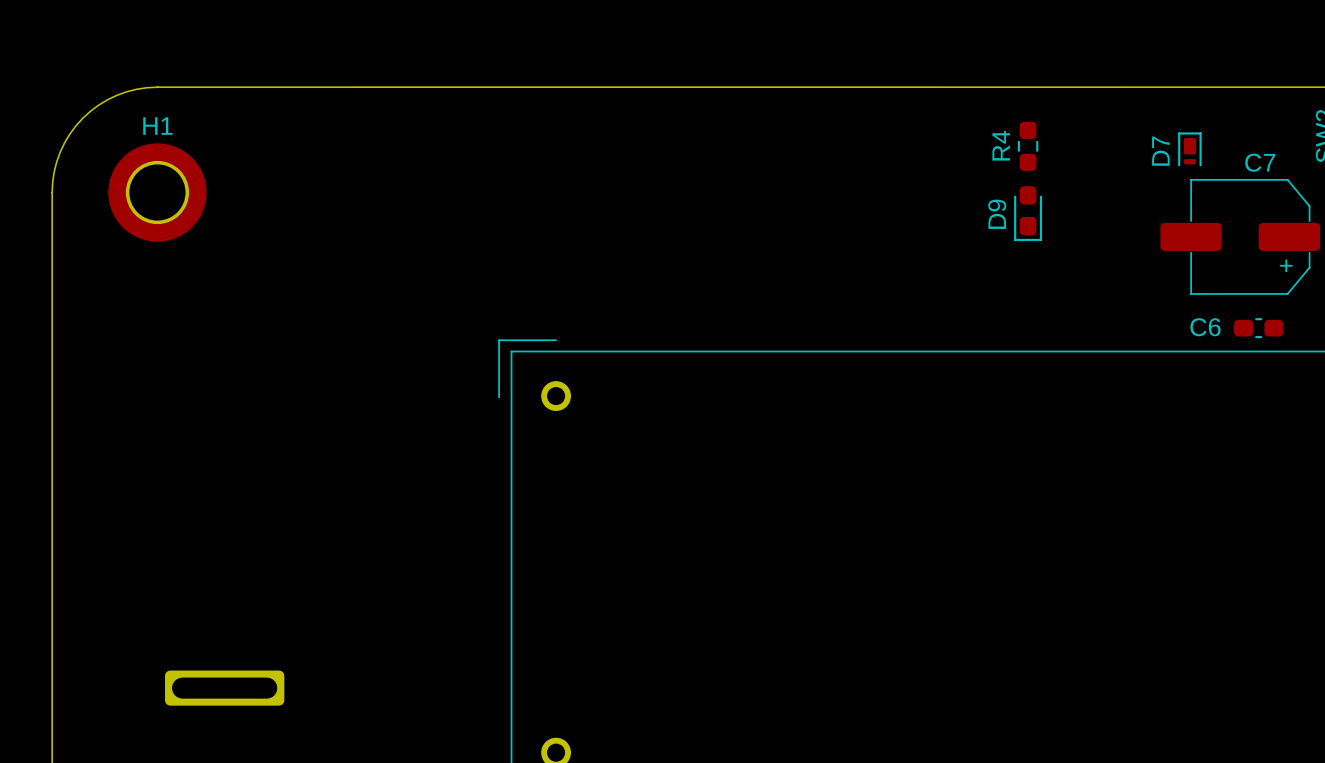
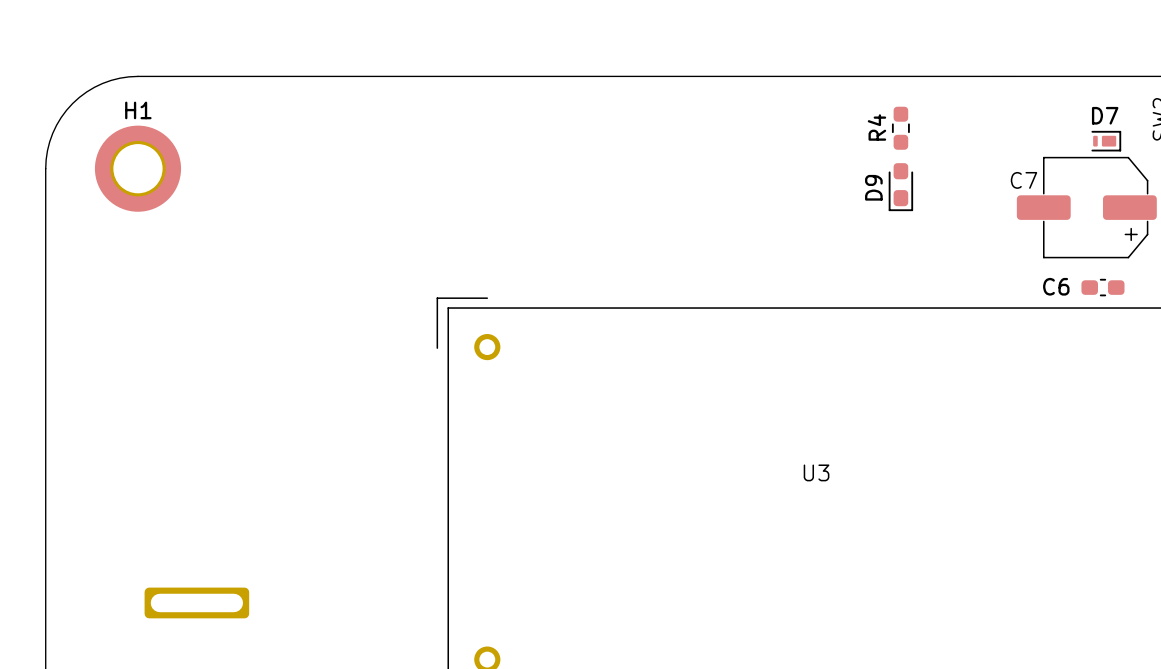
D7 rotation: 0° (1189, 149) -> 90° clockwise (1106, 141)
D7 position: (1189, 149) -> (1106, 141)
C7 name position: C7 (1260, 162) -> C7 (1023, 180)
U3 name: none -> U3 (816, 472)

